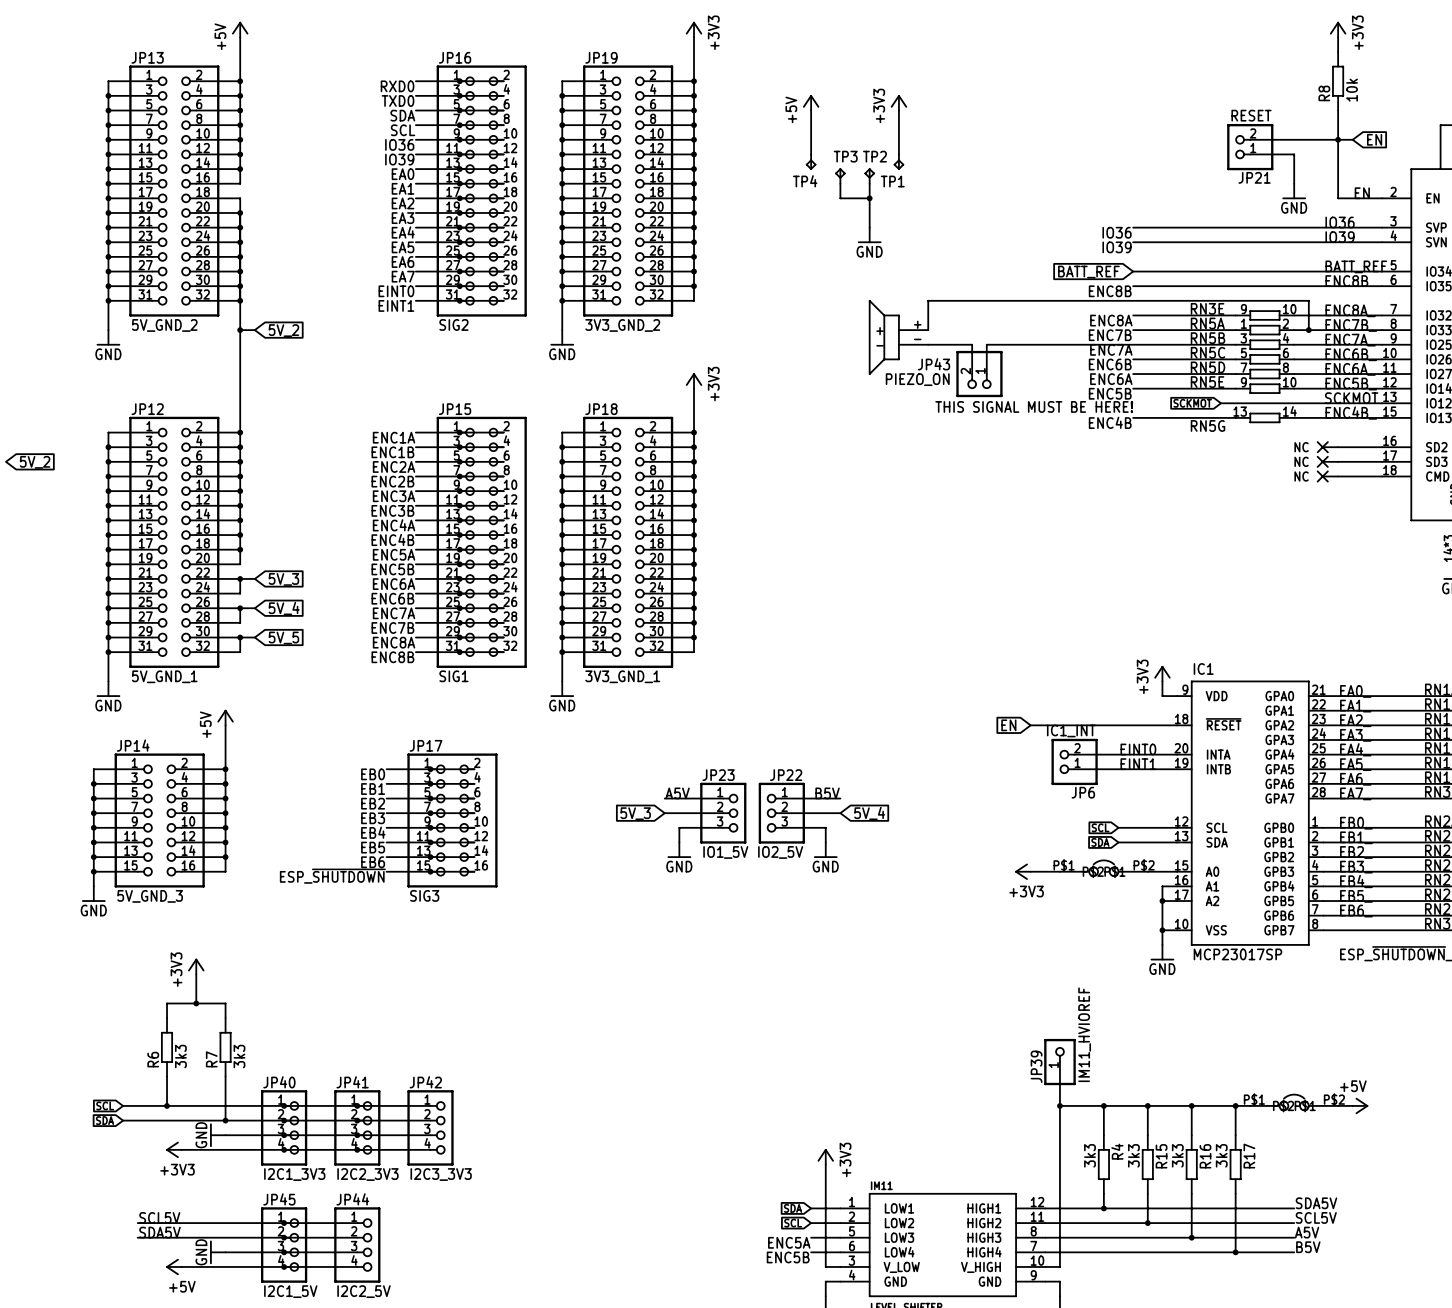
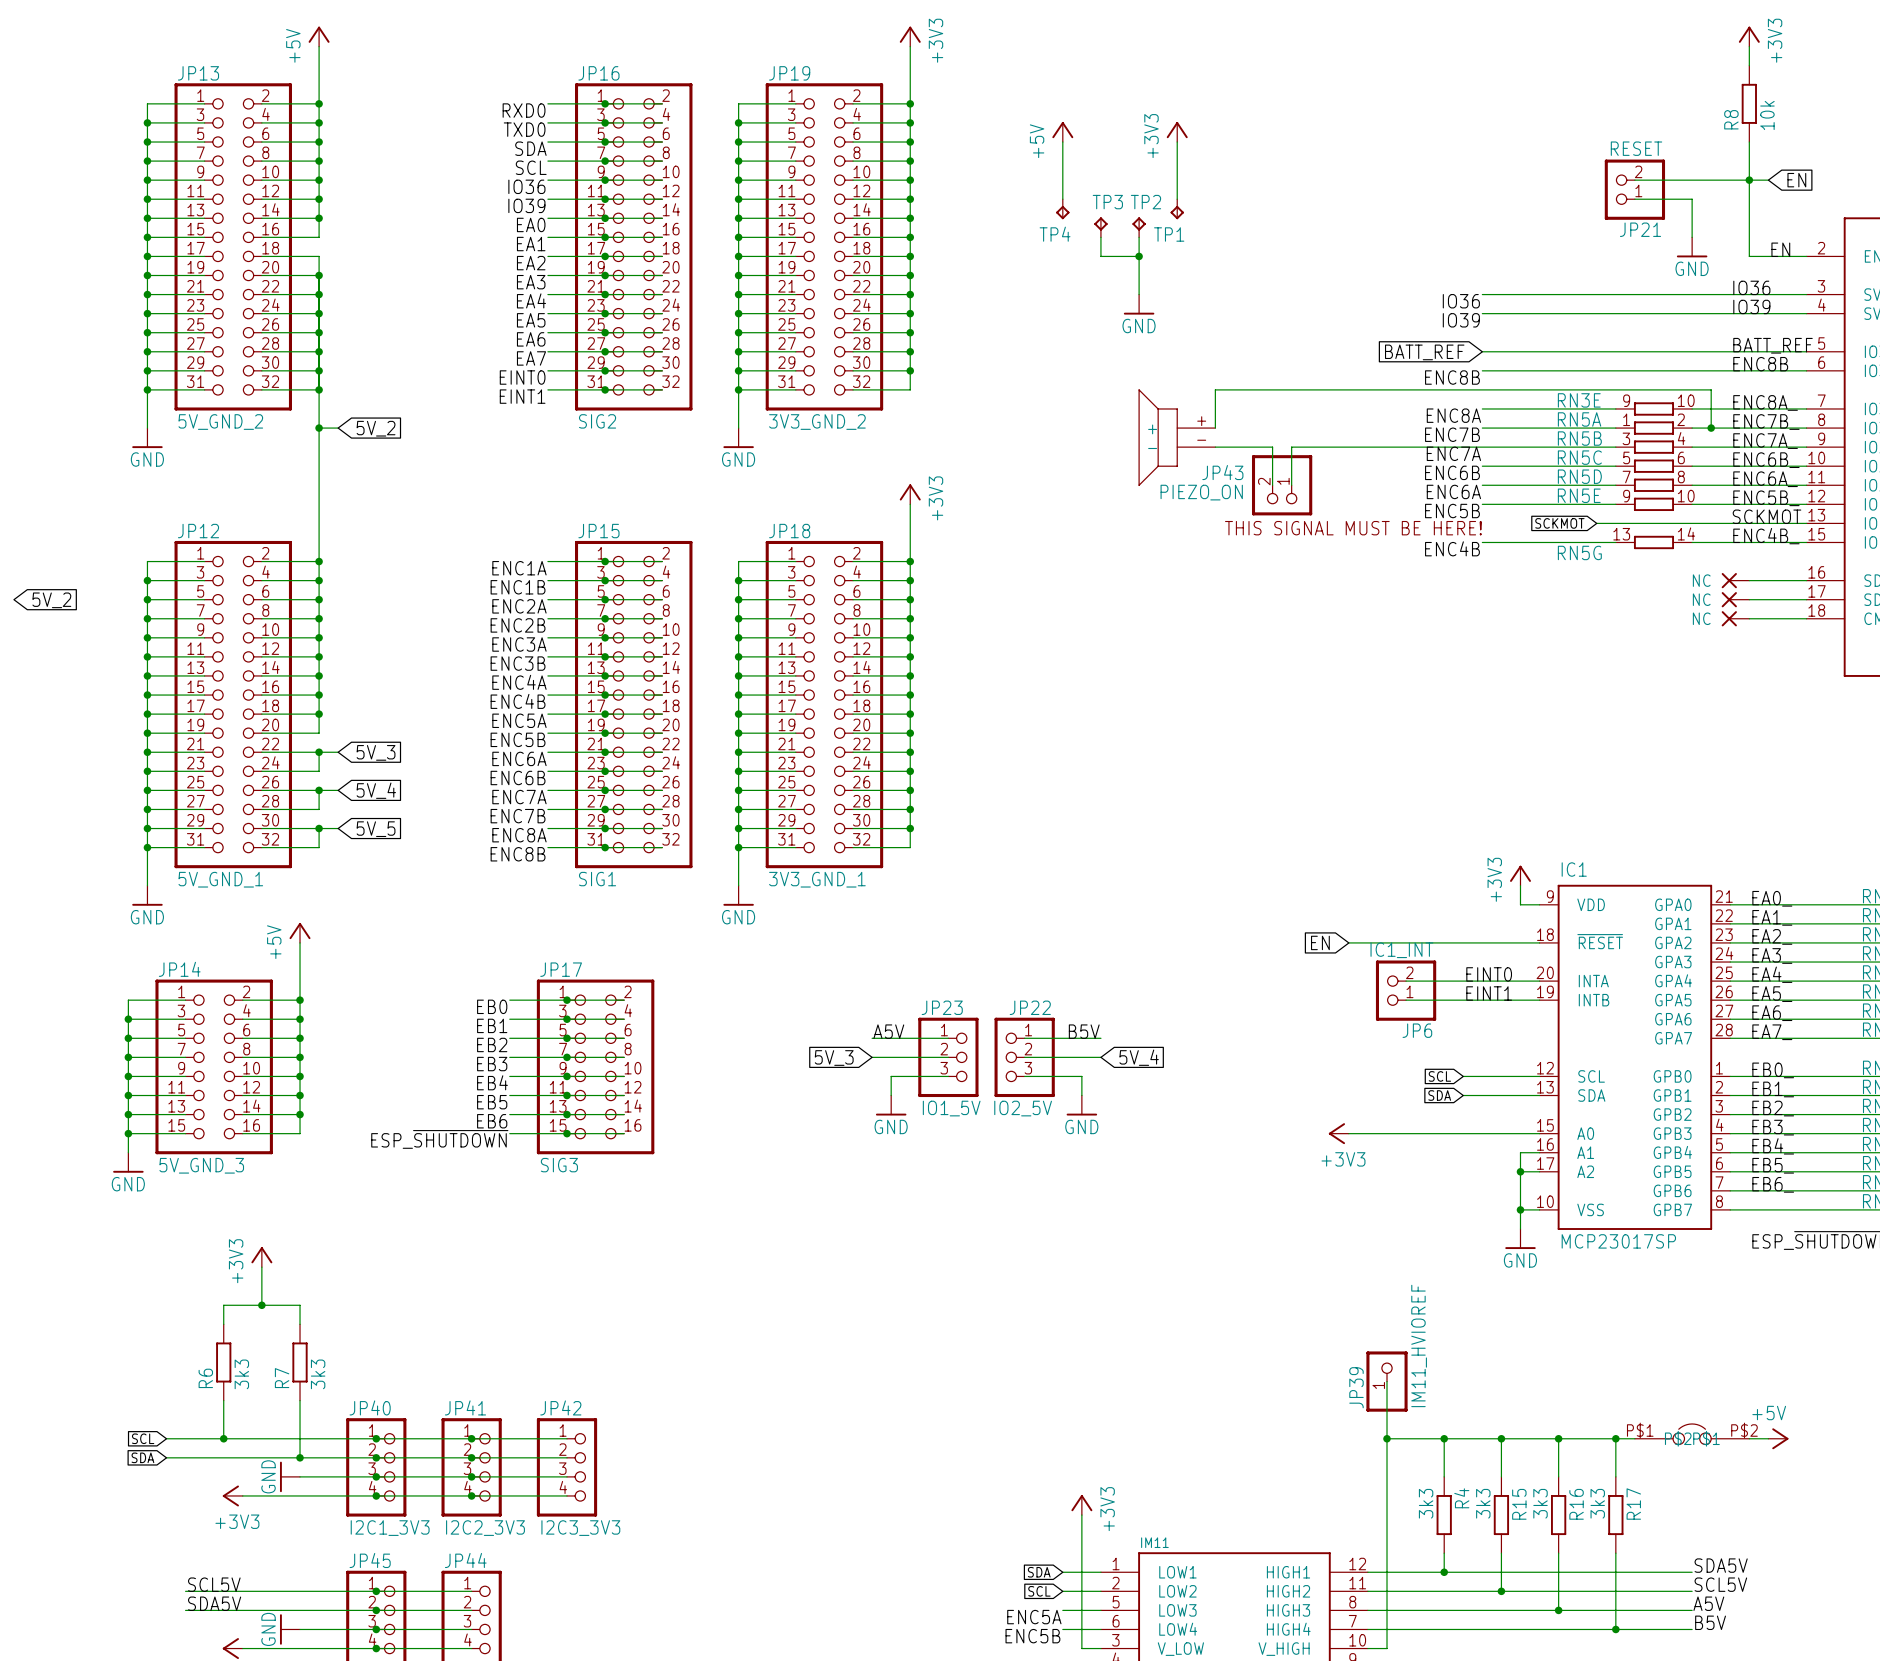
part: (1103, 868) -> none

